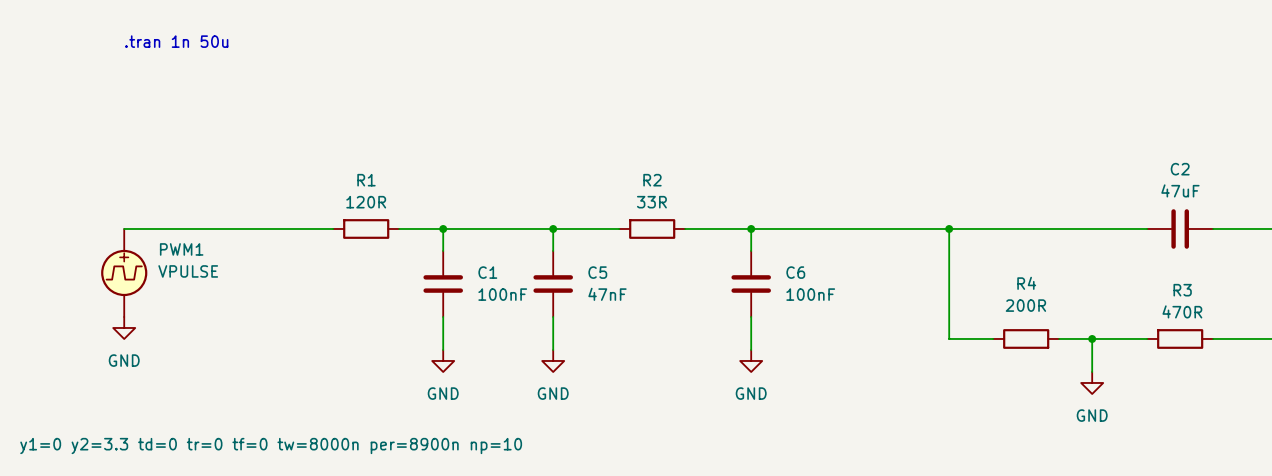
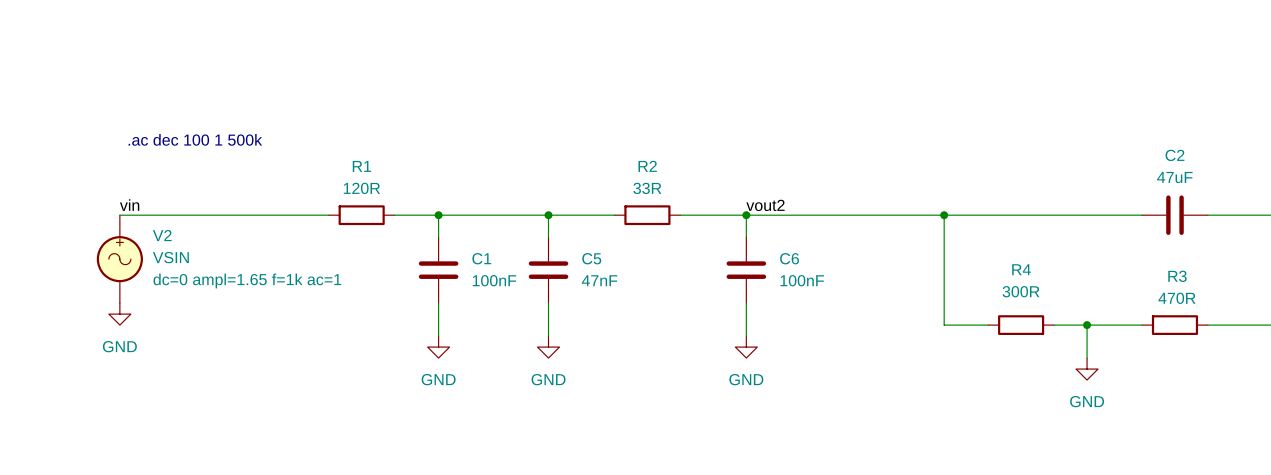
text: .tran 1n 50u (176, 41) -> none
text: none -> .ac dec 100 1 500k (195, 139)
label: none -> vin (129, 205)
label: none -> vout2 (765, 205)
PWM1: VPULSE (124, 272) -> none
V2: none -> VSIN (119, 259)
R4 value: 200R (1025, 305) -> 300R (1021, 291)

